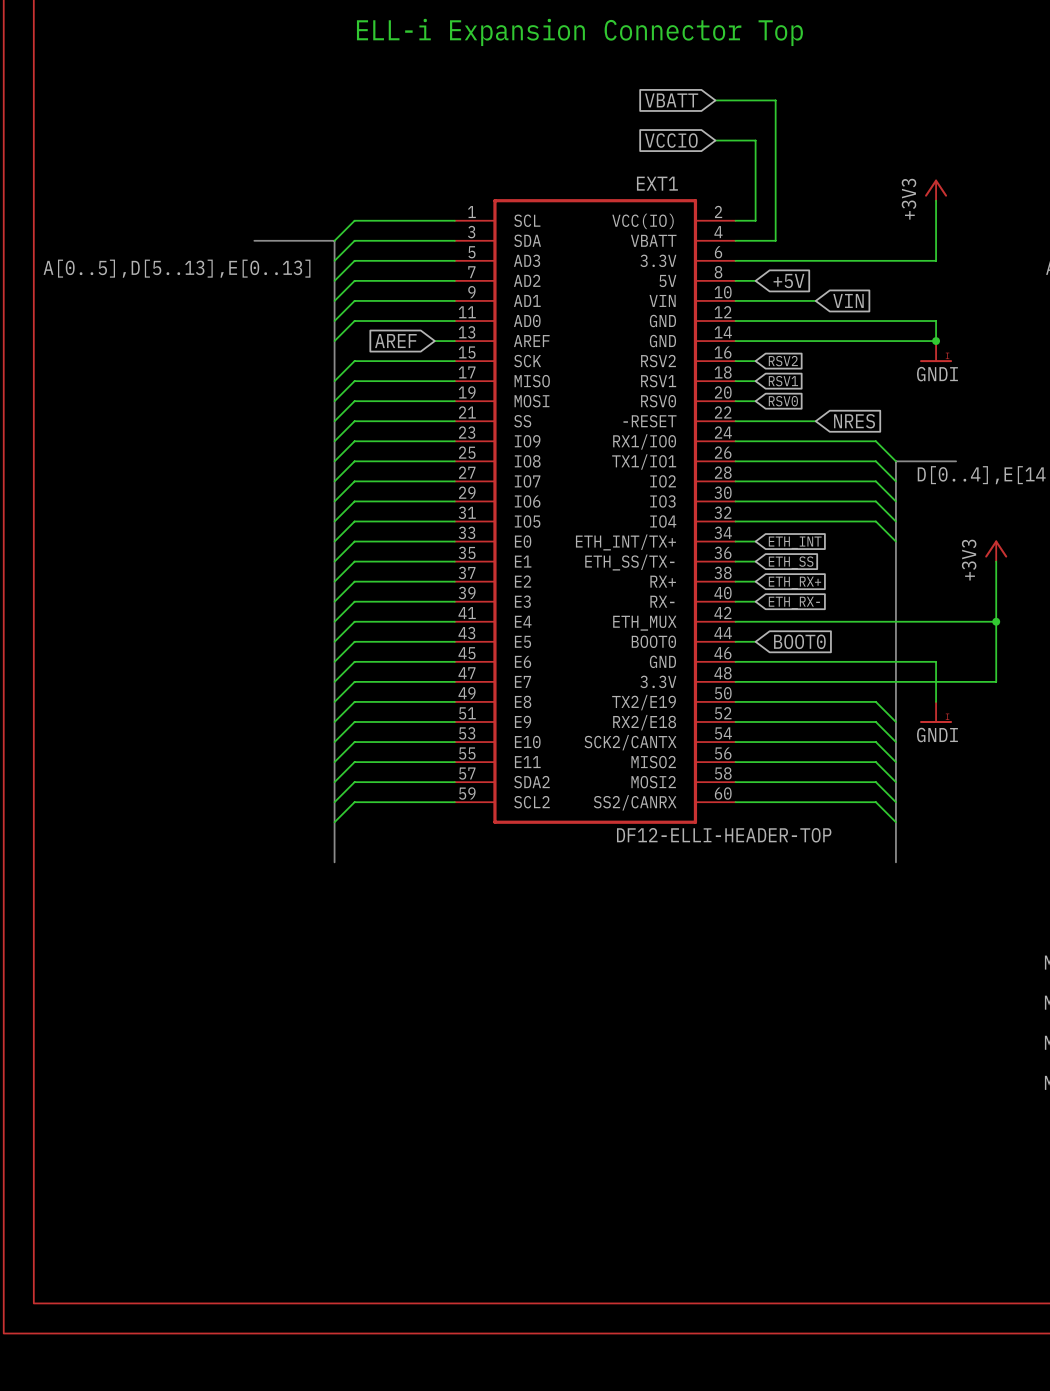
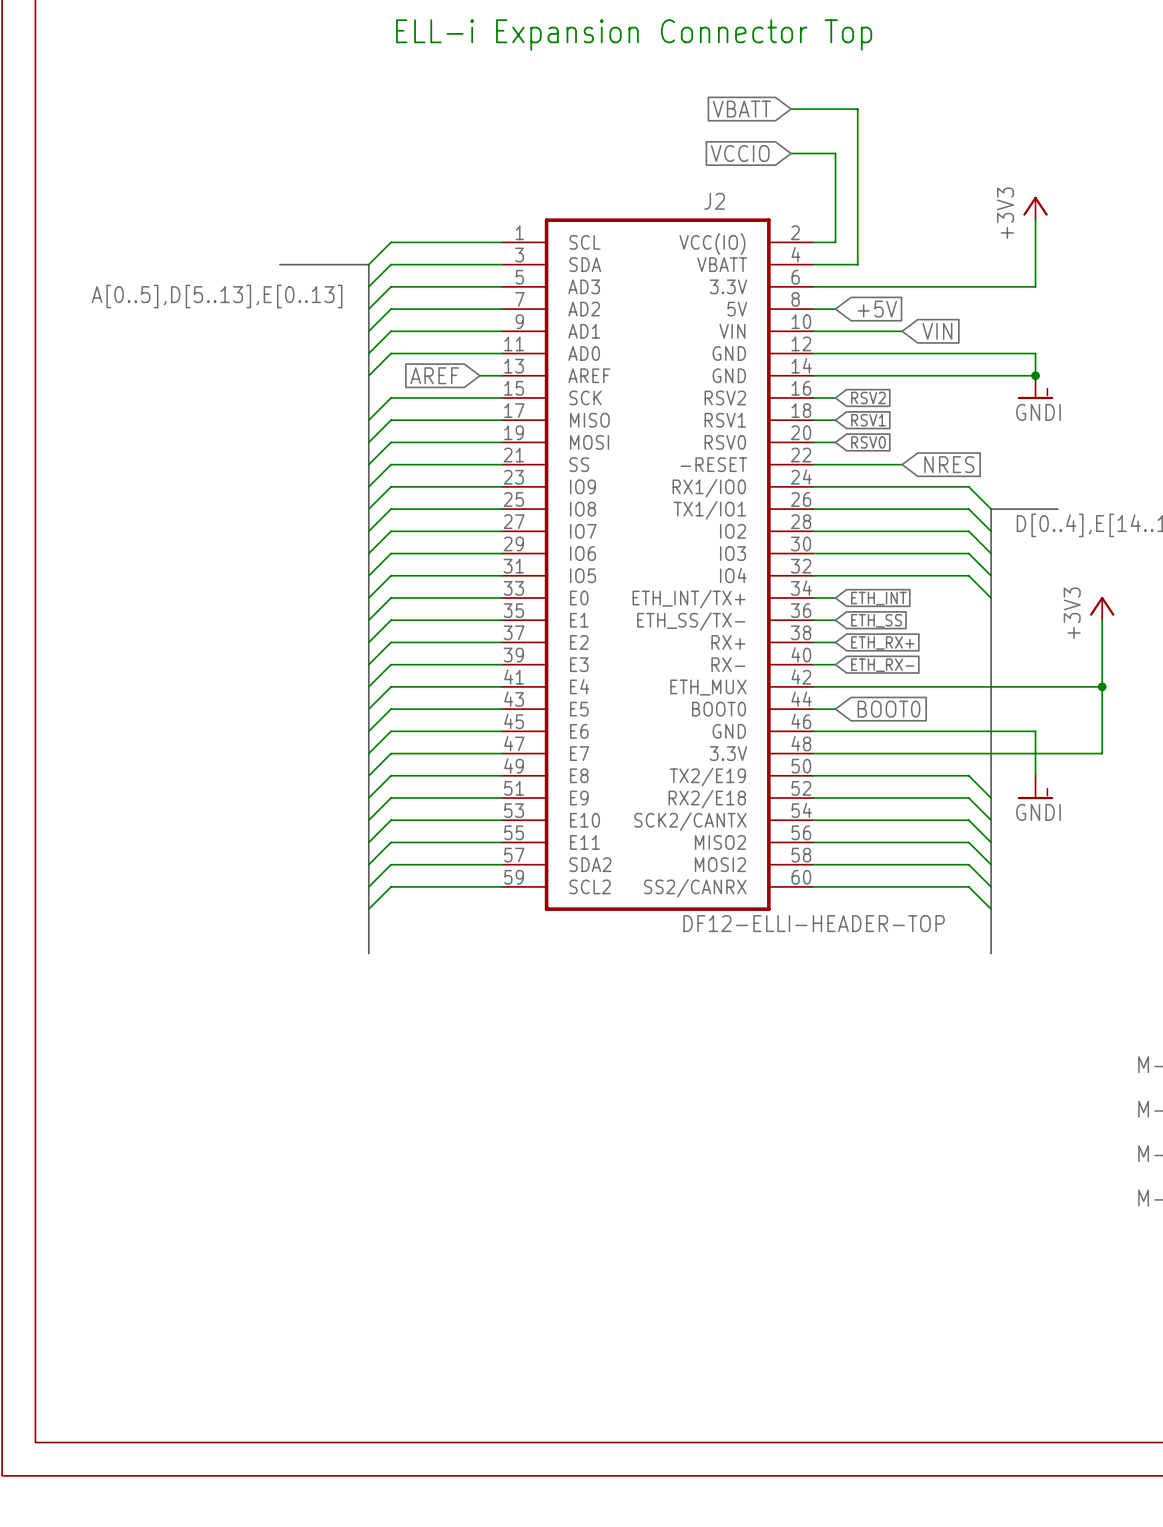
EXT1 name: EXT1 (657, 183) -> J2 (714, 201)

